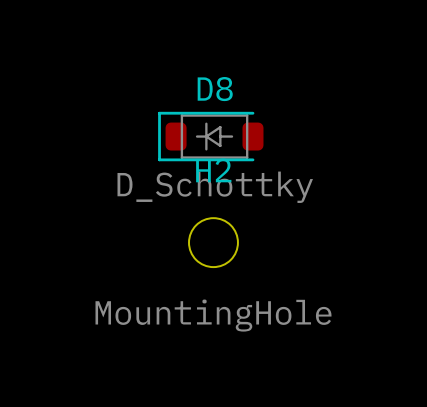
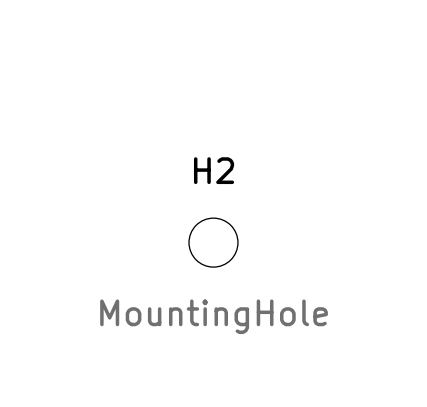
D8: D_Schottky (210, 136) -> none

